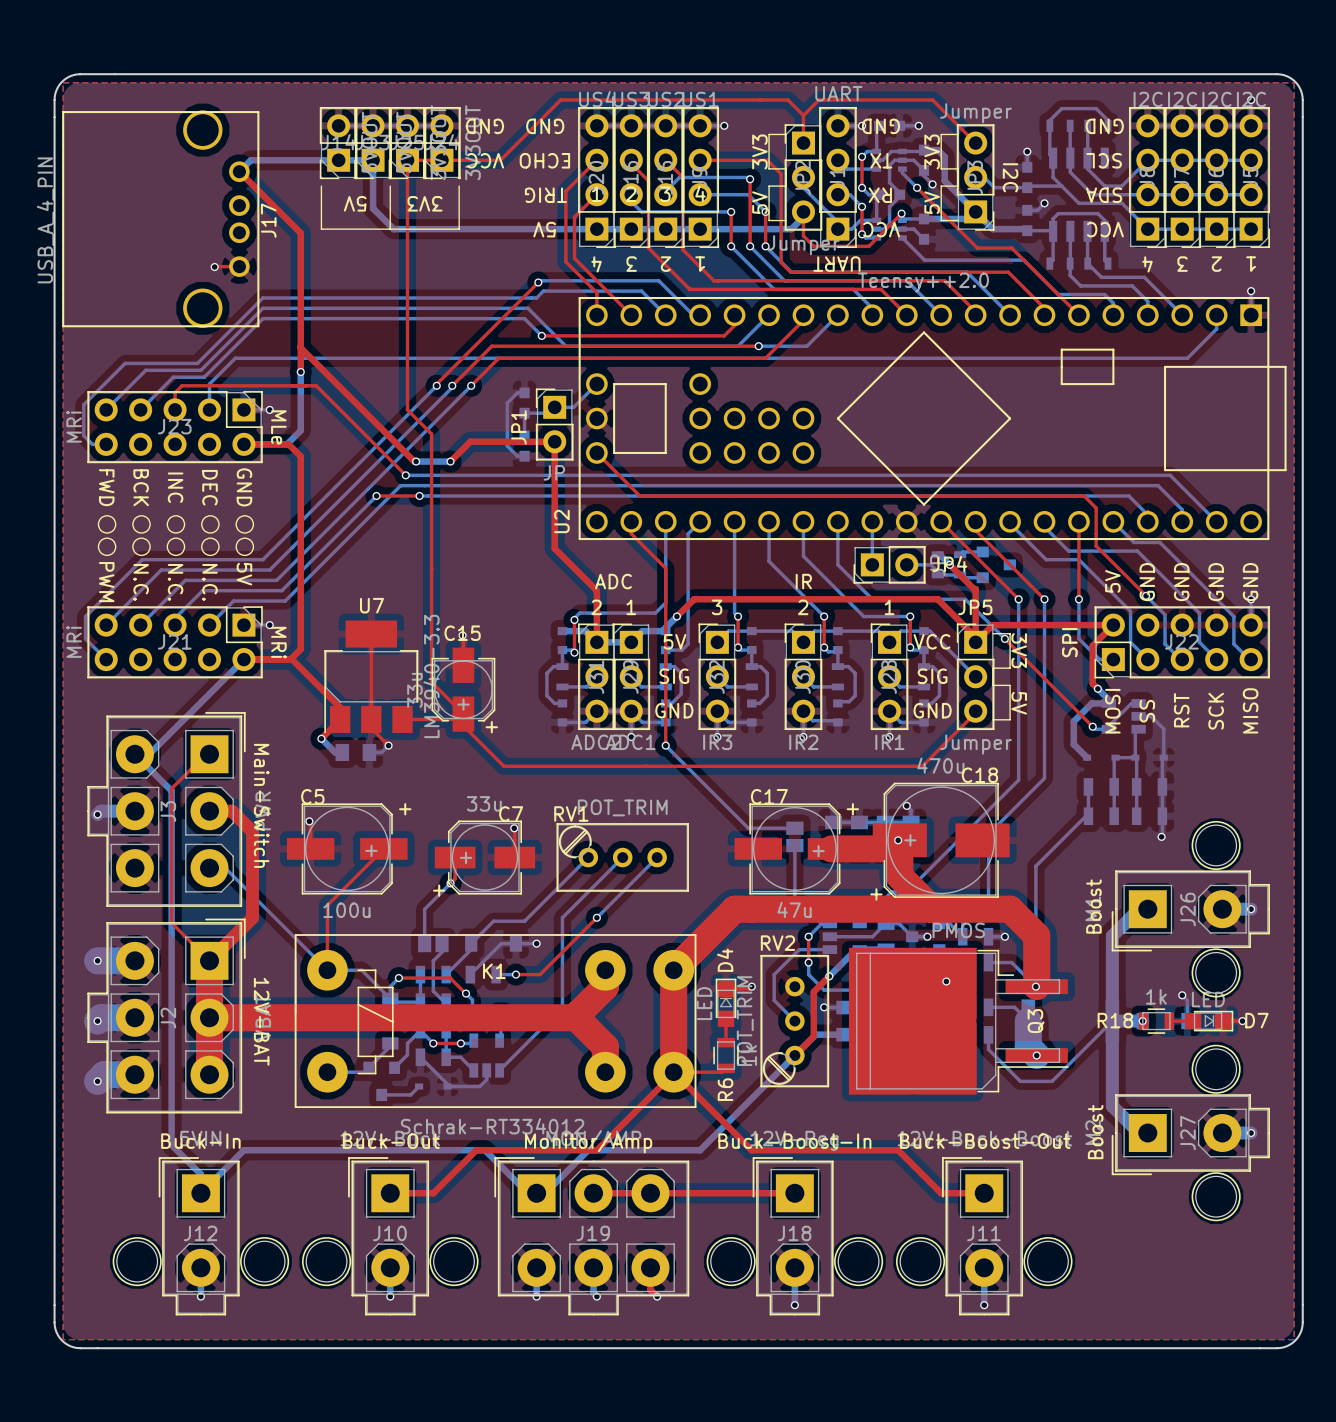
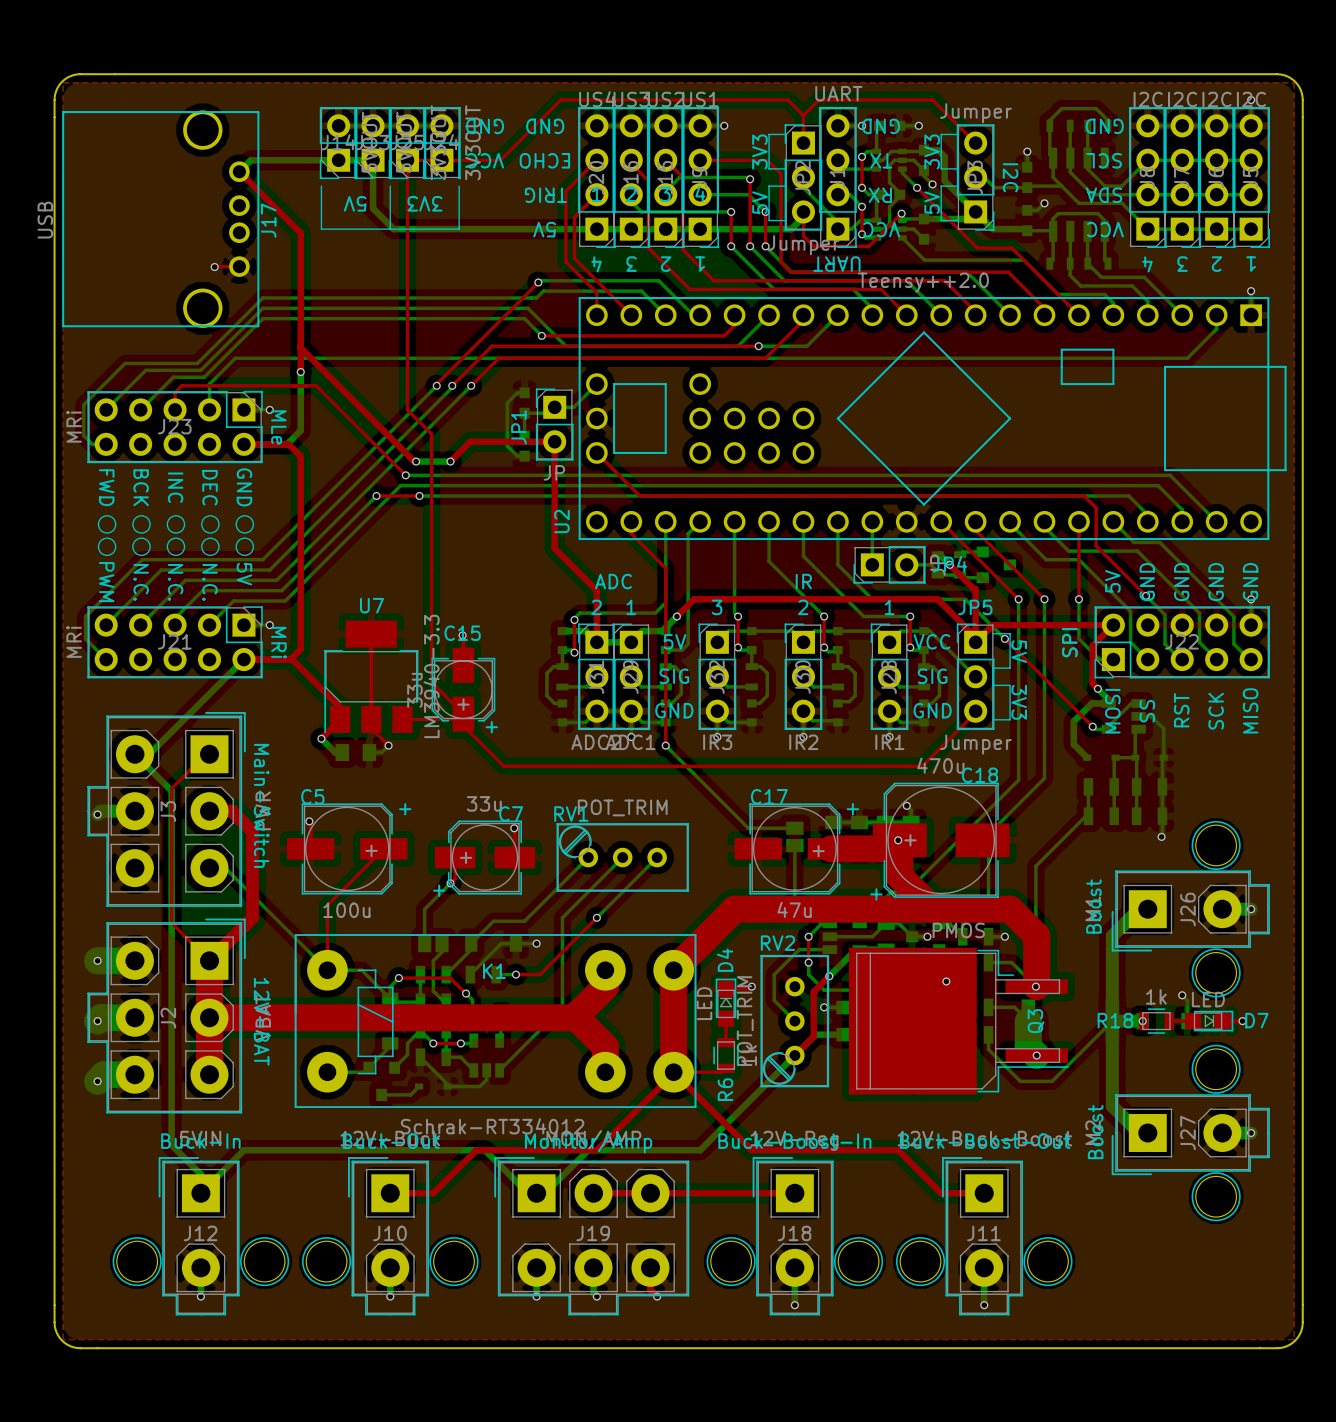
J17 value: USB_A_4_PIN (45, 220) -> USB (45, 220)
text: 3V3 (1019, 650) -> 5V (1019, 651)
text: 5V (1019, 703) -> 3V3 (1019, 702)

